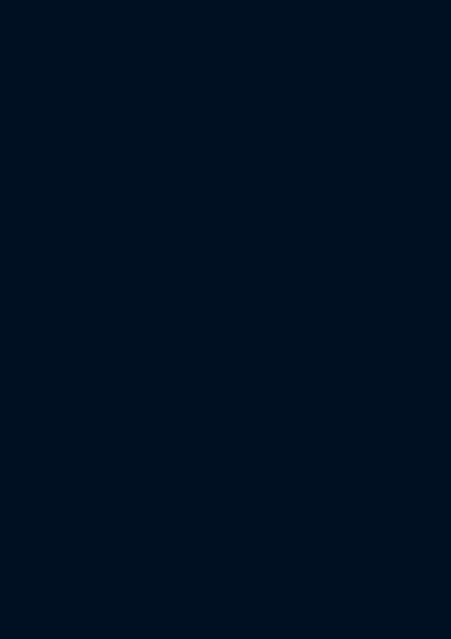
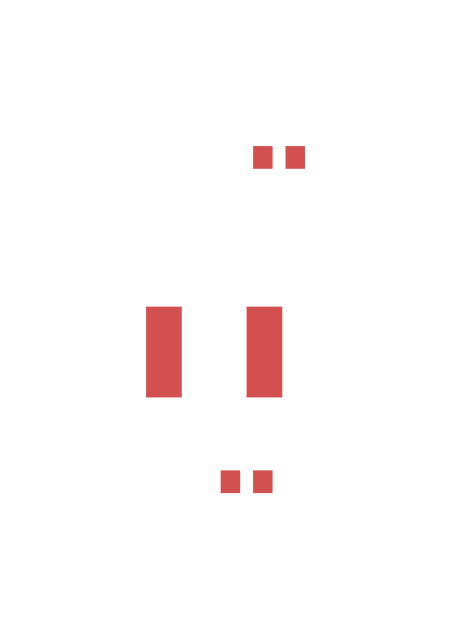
part: none -> (279, 157)
part: none -> (214, 352)
part: none -> (246, 481)

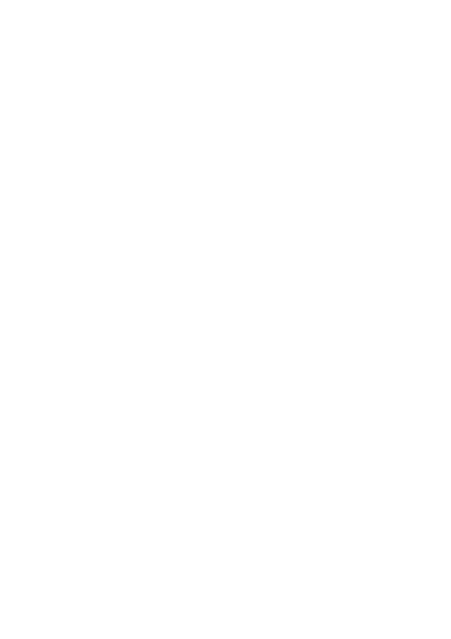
part: (279, 157) -> none
part: (214, 352) -> none
part: (246, 481) -> none

